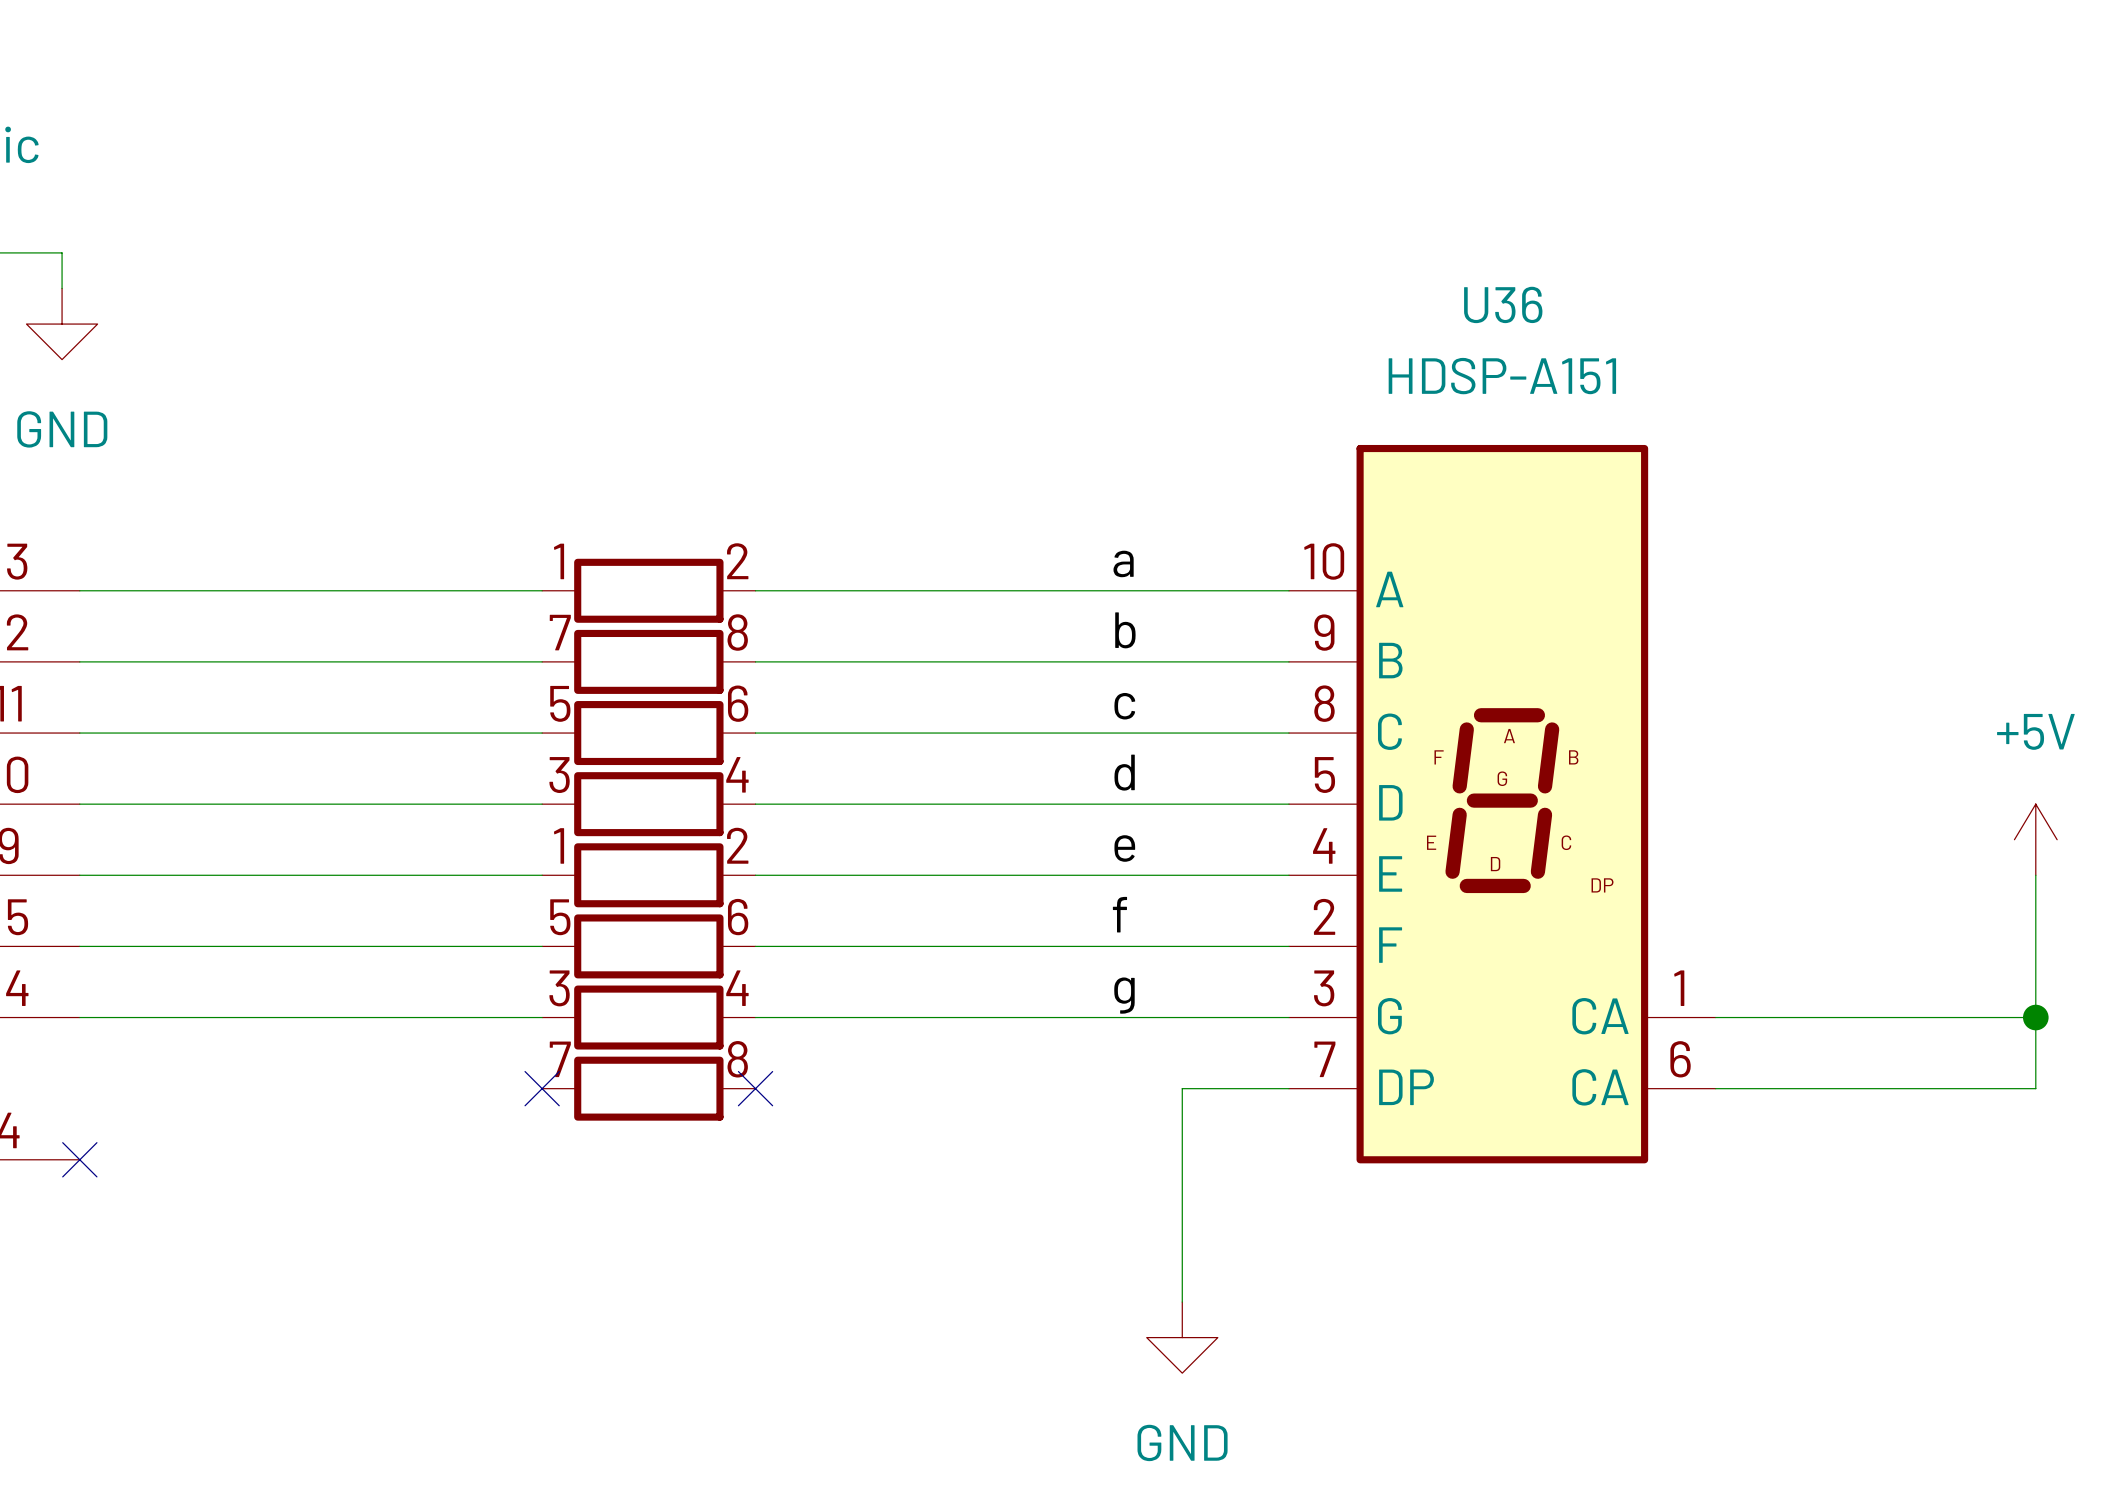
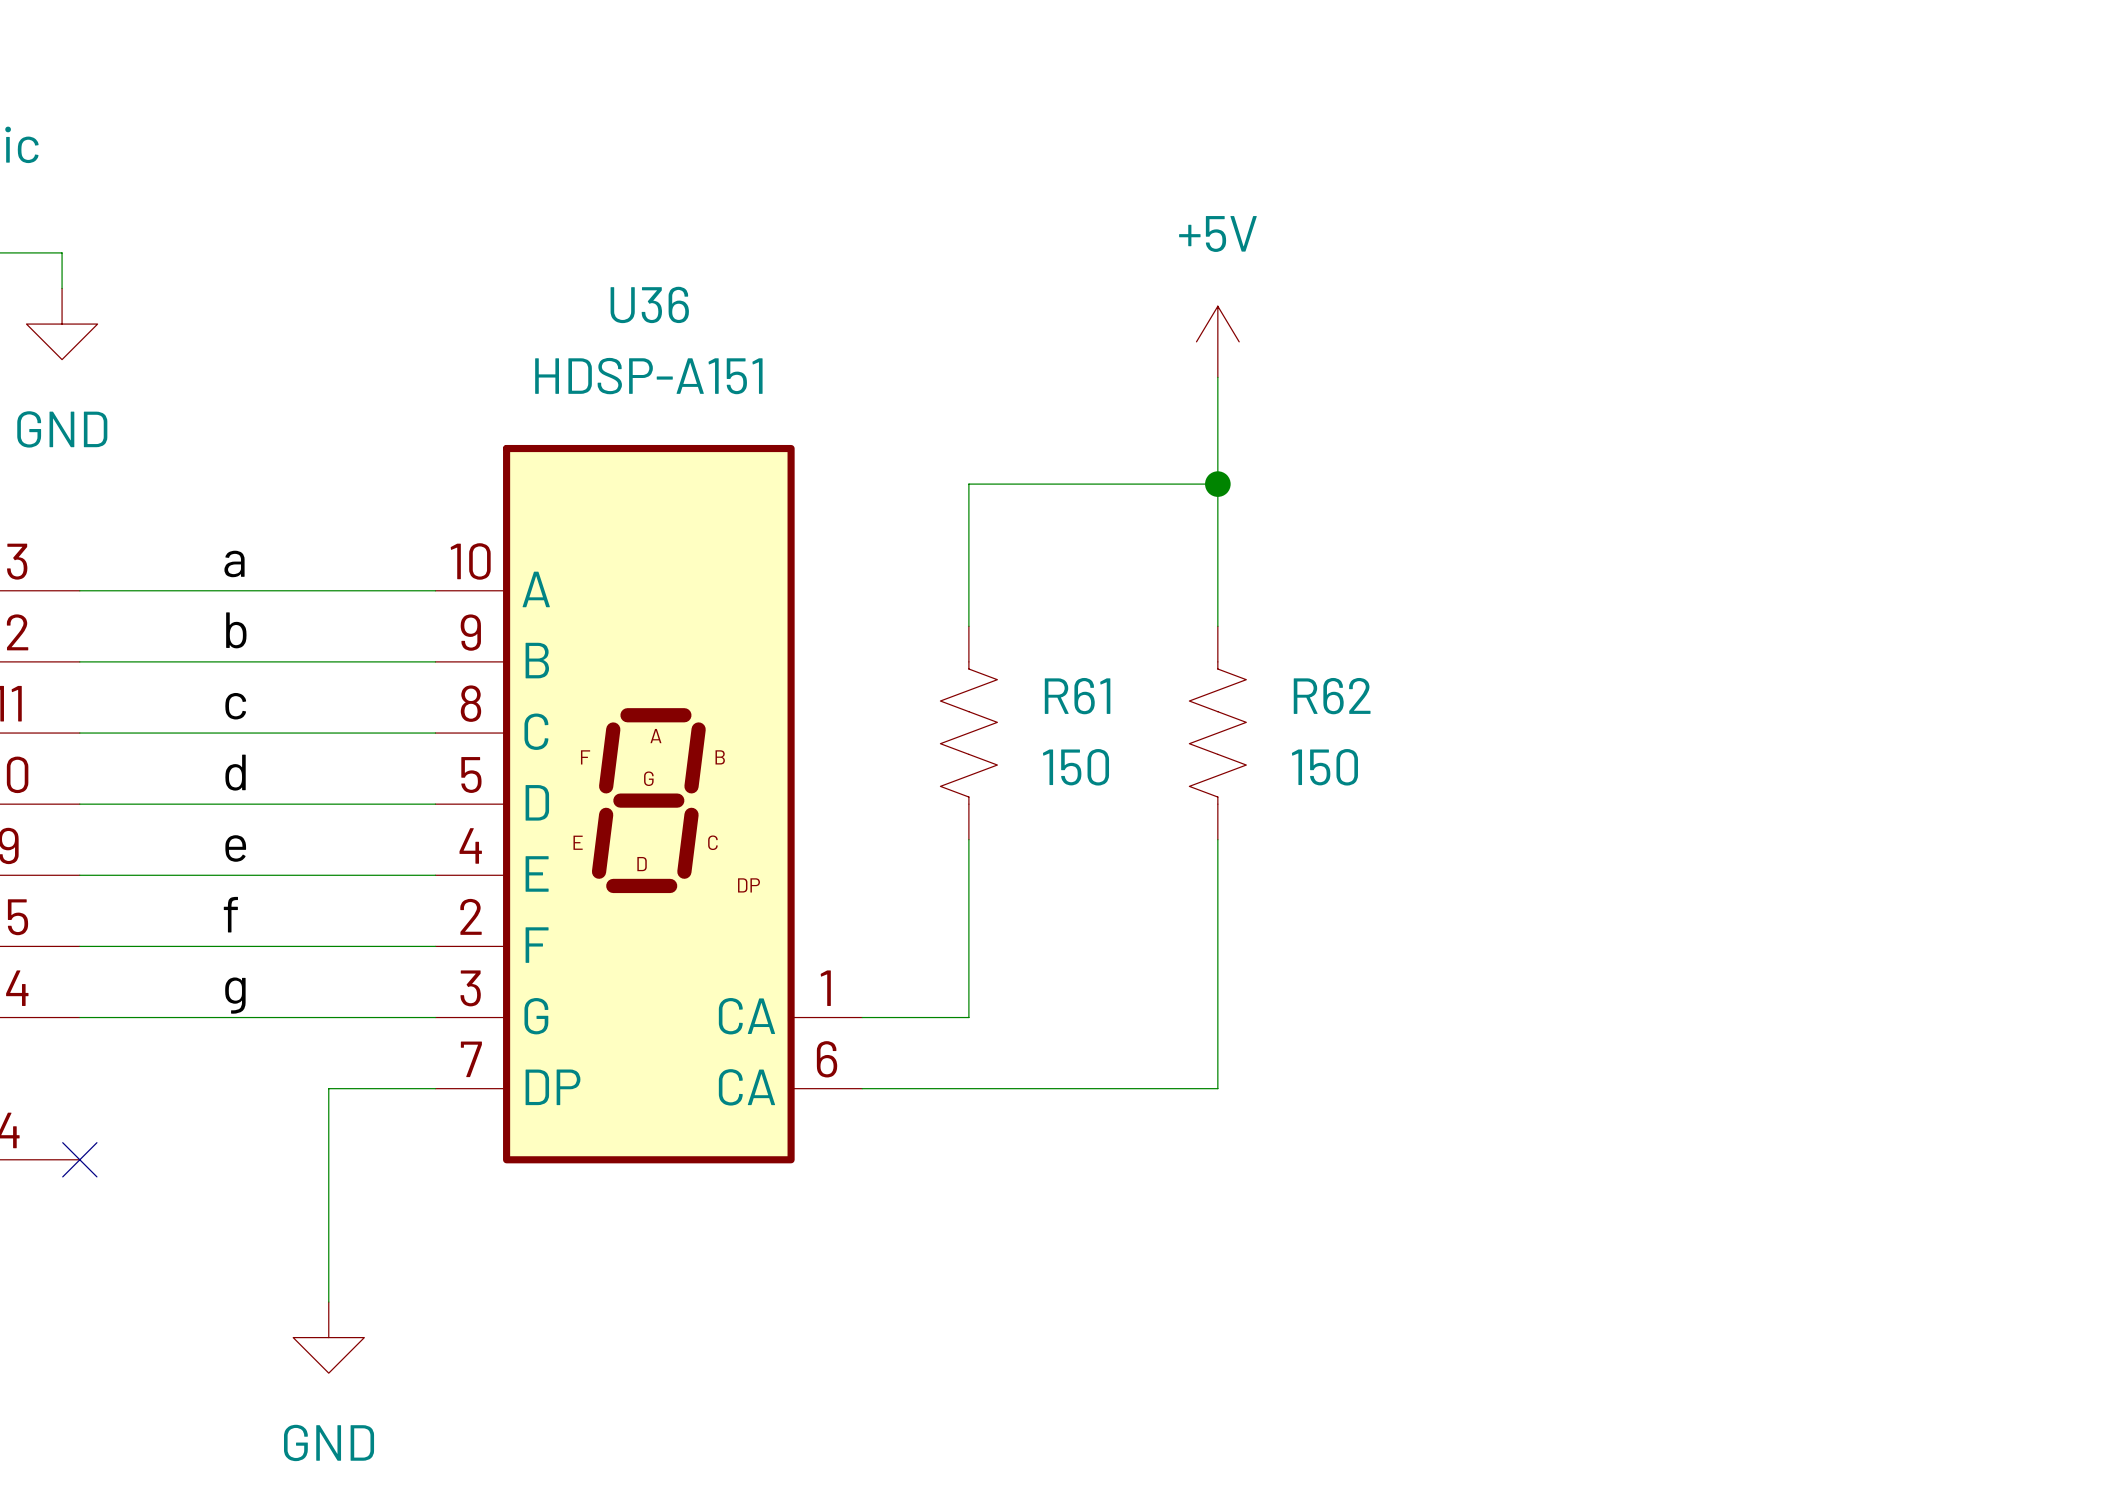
power symbol: none -> +5V (1217, 341)
wire: none -> (1217, 377) (1217, 626)
wire: none -> (1217, 484) (968, 484) (968, 626)
junction: none -> (1217, 484)
label: none -> a (234, 563)
label: a (1123, 563) -> none
part: (648, 590) -> none
wire: (755, 590) (1288, 590) -> none
label: none -> b (236, 630)
label: b (1125, 630) -> none
part: (648, 661) -> none
wire: (755, 661) (1288, 661) -> none
label: none -> c (235, 706)
label: c (1124, 706) -> none
part: (648, 733) -> none
wire: (755, 733) (1288, 733) -> none
R61: none -> 150 (968, 733)
R62: none -> 150 (1217, 733)
label: none -> d (235, 772)
label: d (1124, 772) -> none
part: (648, 804) -> none
wire: (755, 804) (1288, 804) -> none
U36 position: (1502, 804) -> (648, 804)
power symbol: +5V (2035, 839) -> none
label: none -> e (235, 848)
label: e (1124, 848) -> none
part: (648, 875) -> none
wire: (755, 875) (1288, 875) -> none
wire: (2035, 875) (2035, 1088) (1715, 1088) -> none
label: none -> f (230, 914)
label: f (1119, 914) -> none
part: (648, 946) -> none
wire: (755, 946) (1288, 946) -> none
label: none -> g (235, 995)
label: g (1124, 995) -> none
part: (648, 1017) -> none
wire: (968, 1017) (1288, 1017) -> (968, 1017) (968, 839)
wire: (1715, 1017) (2035, 1017) -> none
junction: (2035, 1017) -> none
wire: none -> (435, 1088) (328, 1088) (328, 1302)
no-connect mark: (542, 1088) -> none
part: (648, 1088) -> none
no-connect mark: (755, 1088) -> none
wire: (1182, 1088) (1182, 1302) -> (1182, 1088) (862, 1088)
wire: (1217, 1088) (1288, 1088) -> (1217, 1088) (1217, 839)
power symbol: none -> GND (328, 1337)
power symbol: GND (1182, 1337) -> none

